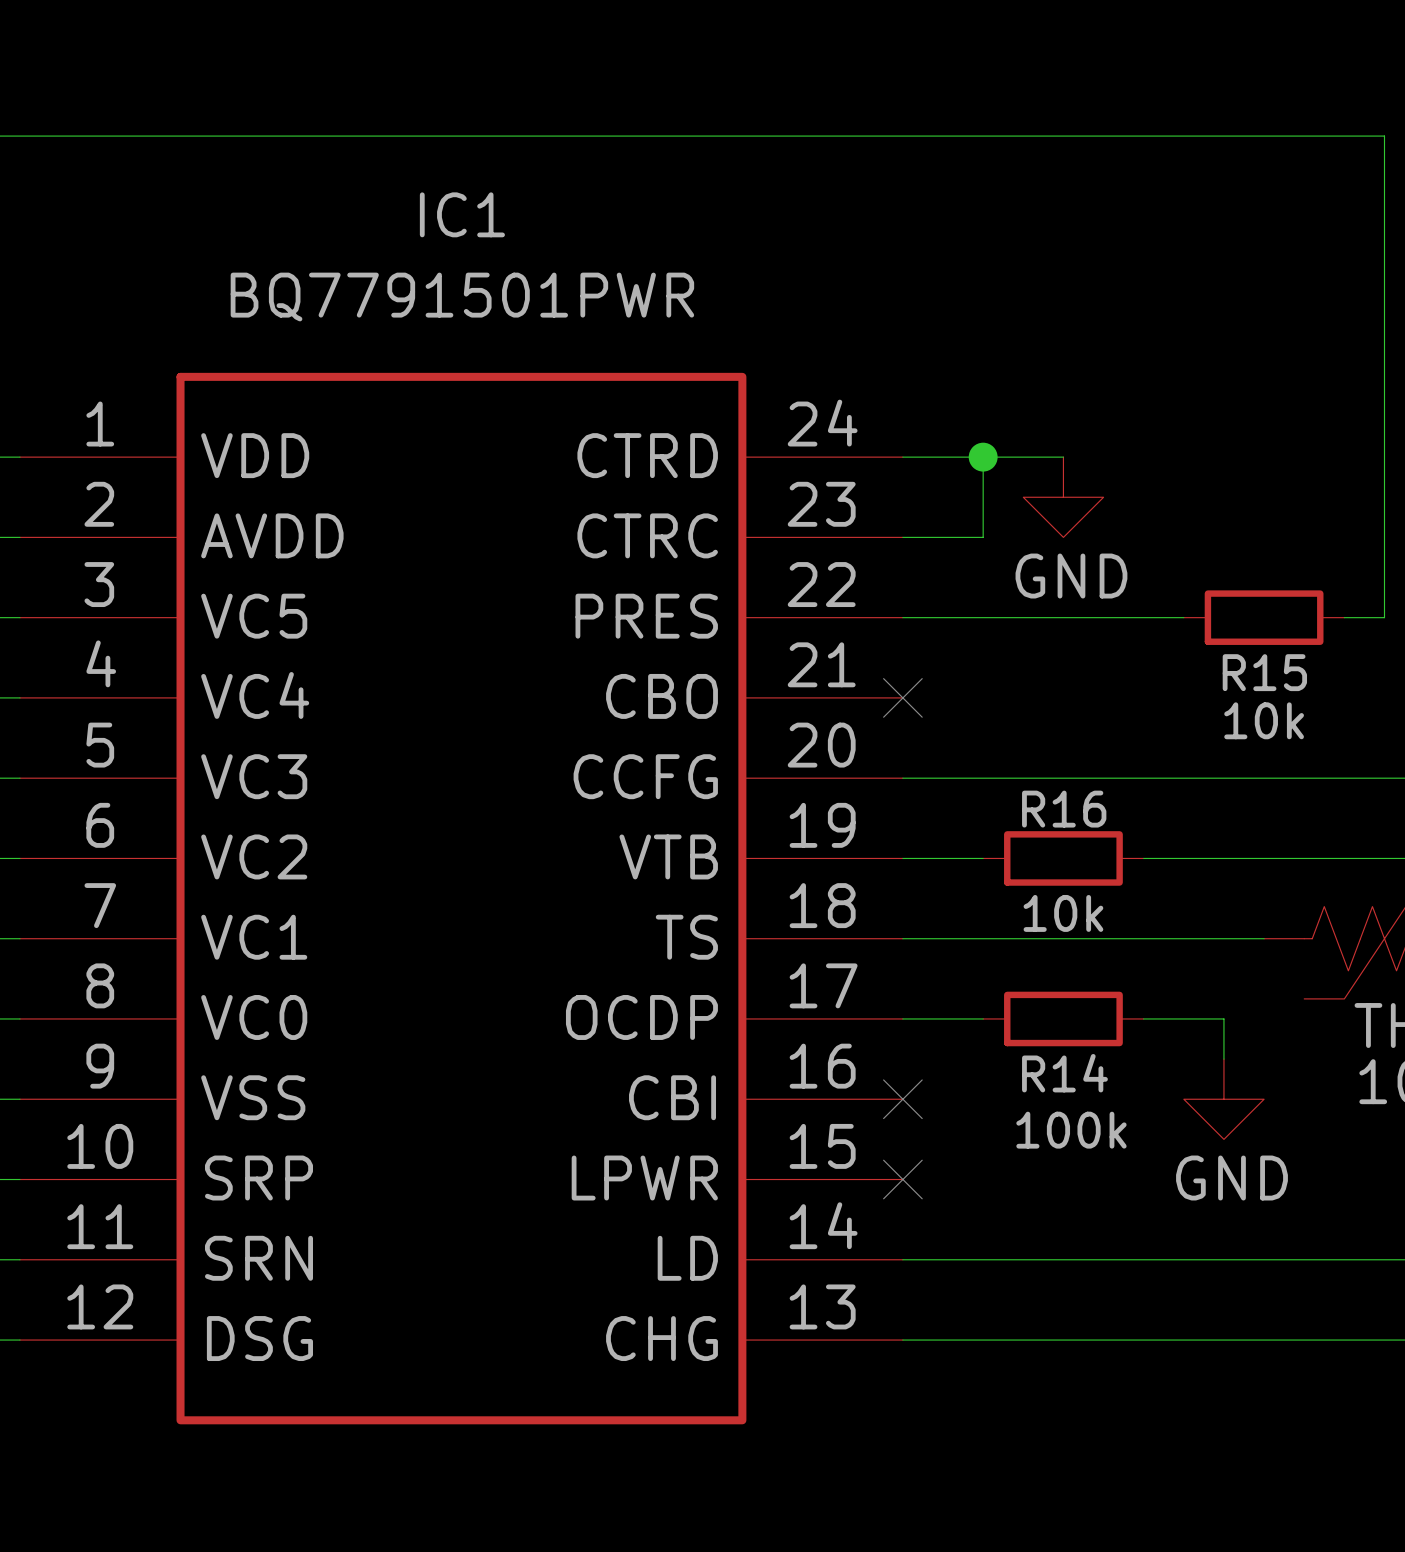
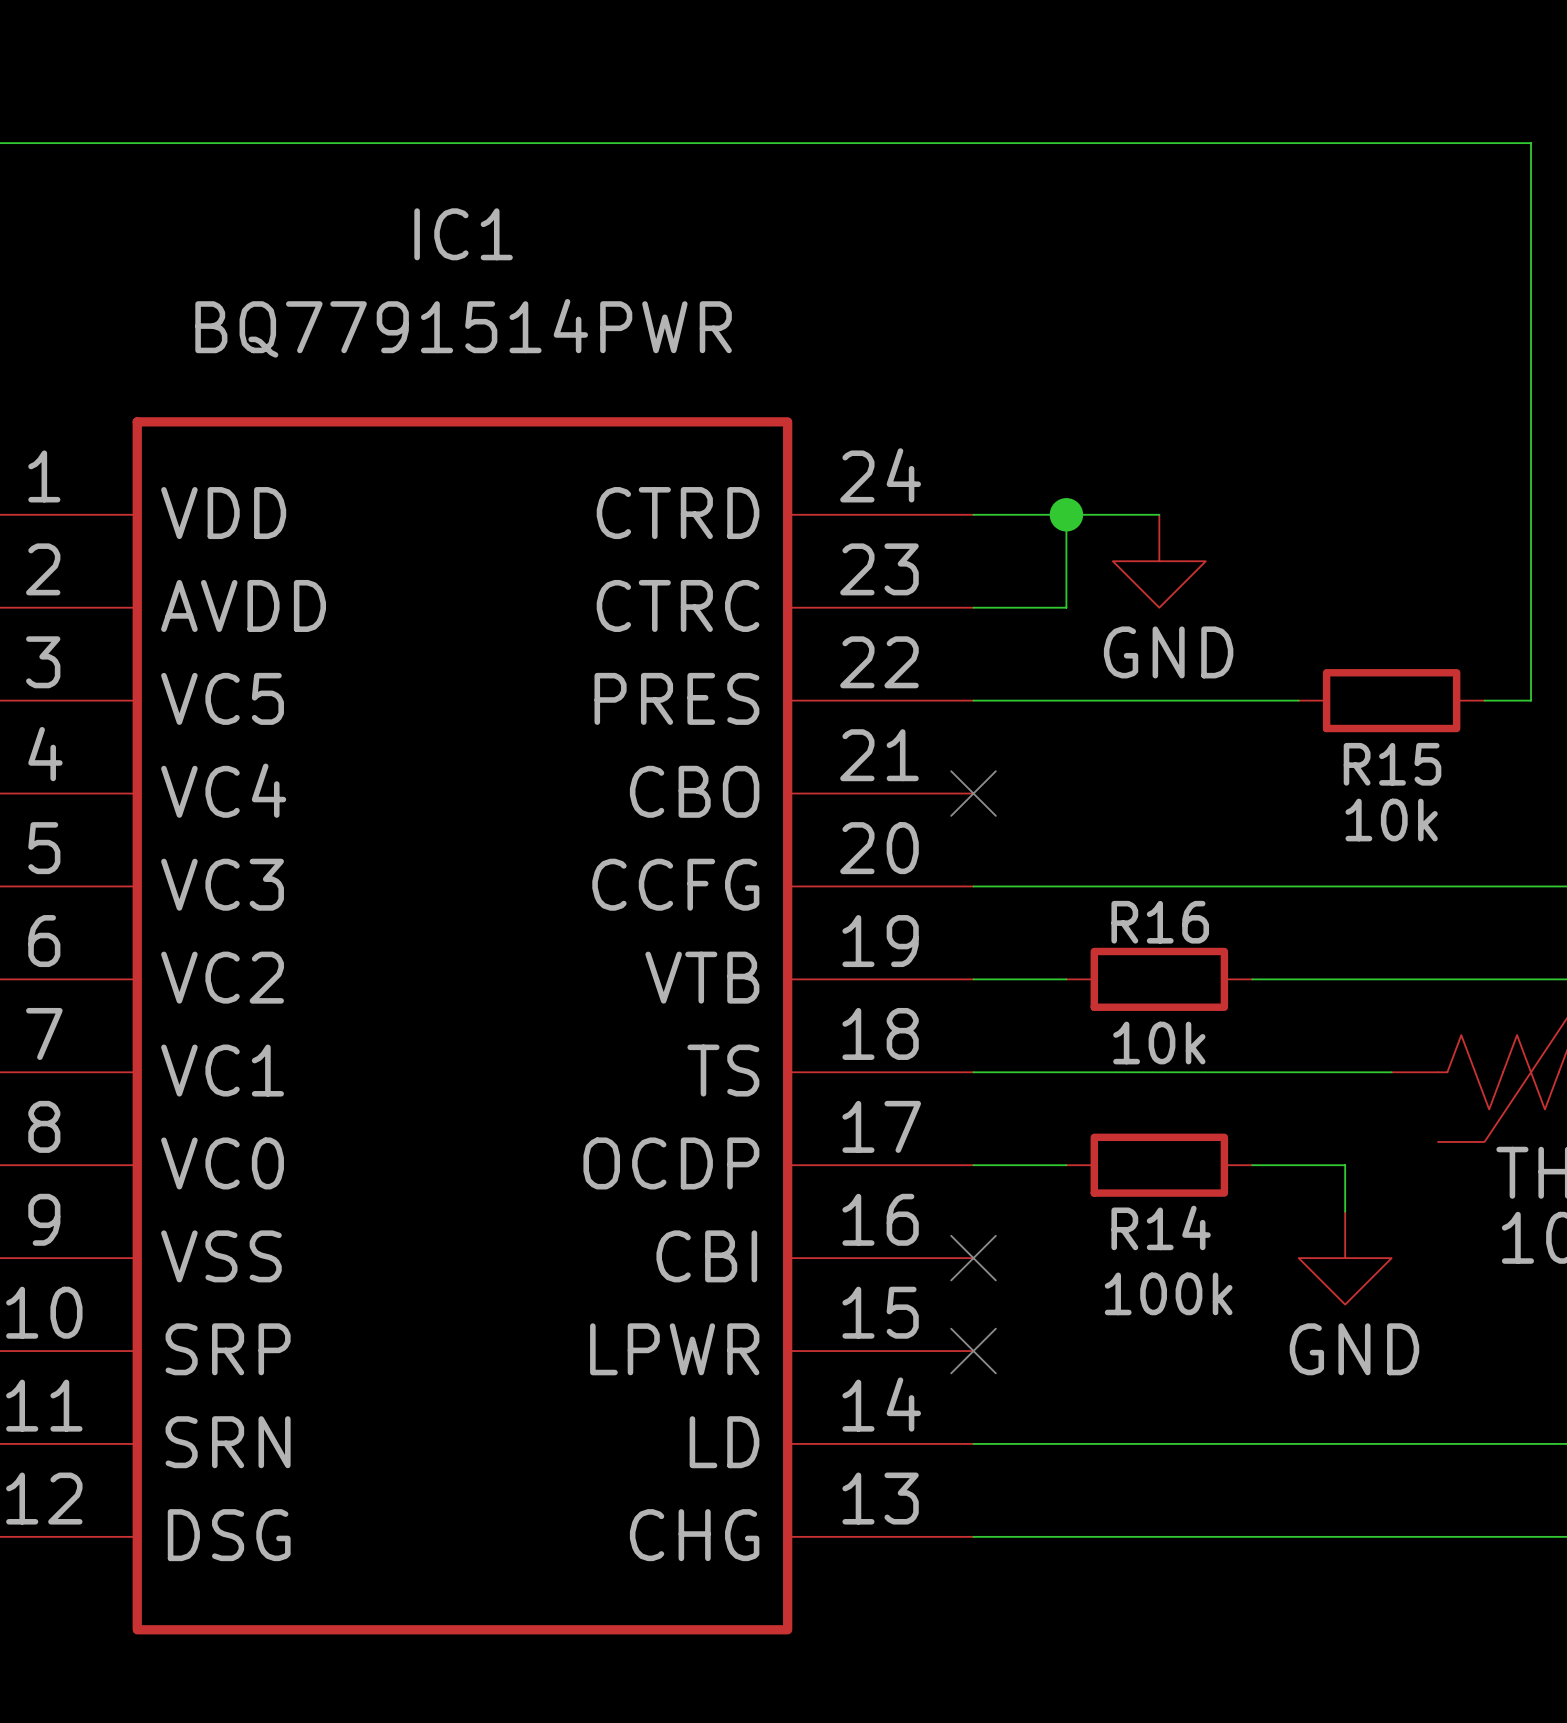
IC1 value: BQ7791501PWR (462, 297) -> BQ7791514PWR (463, 328)

